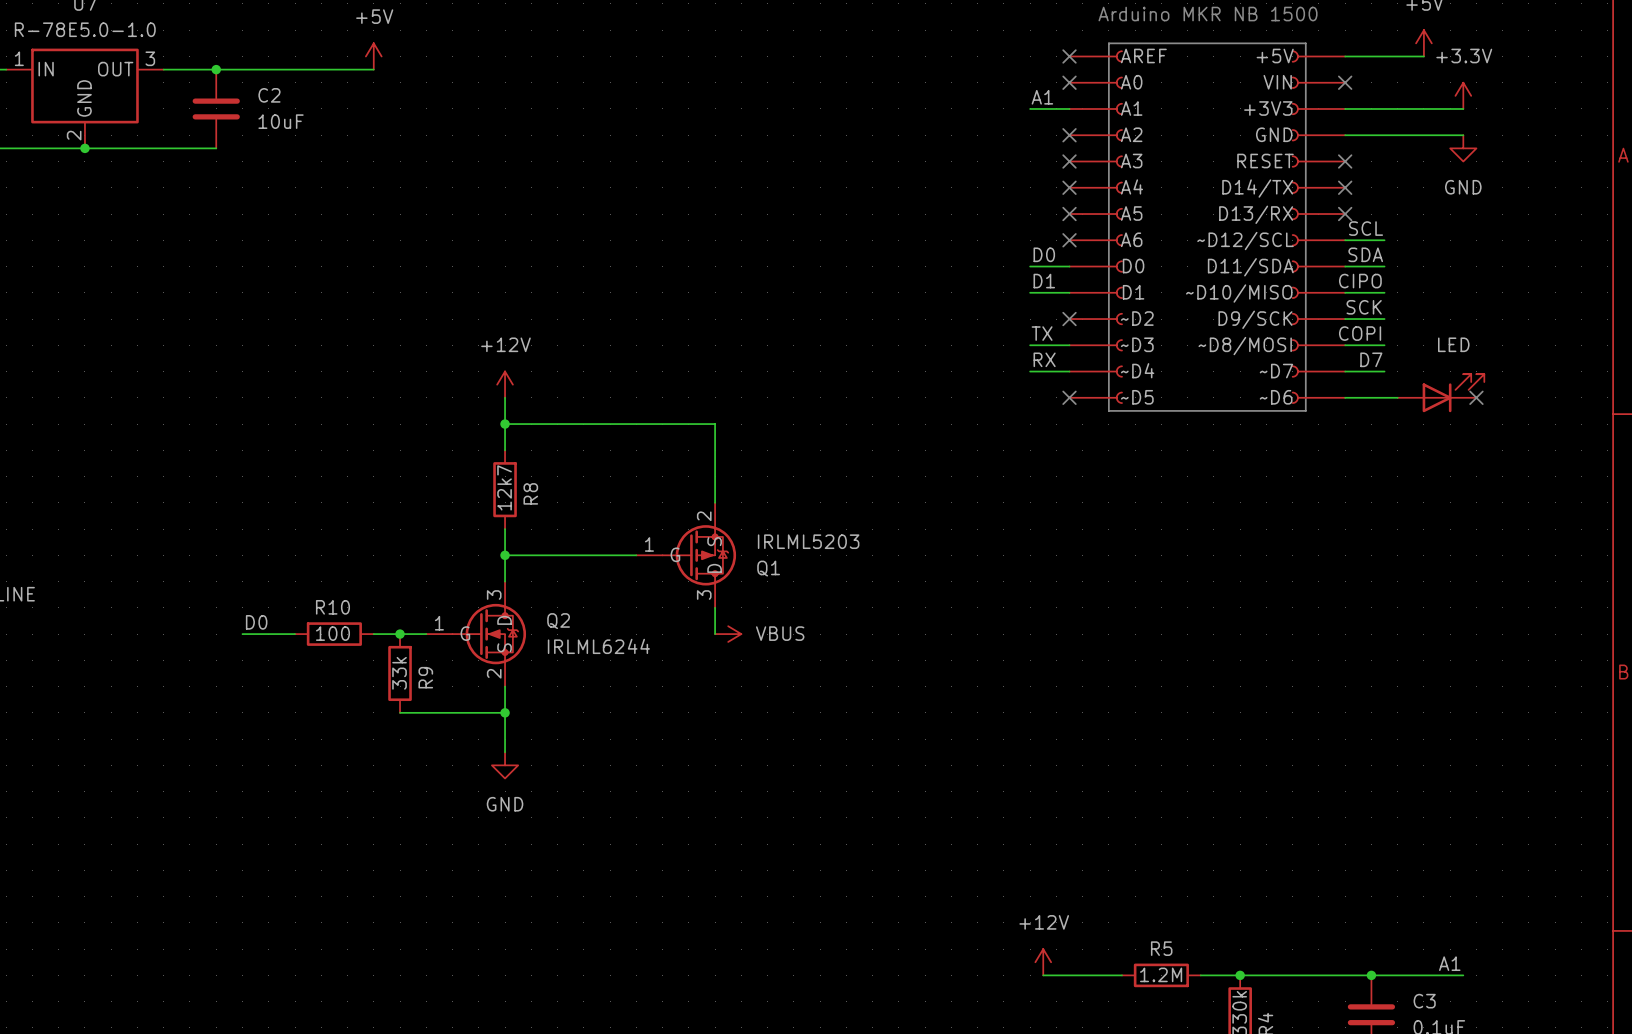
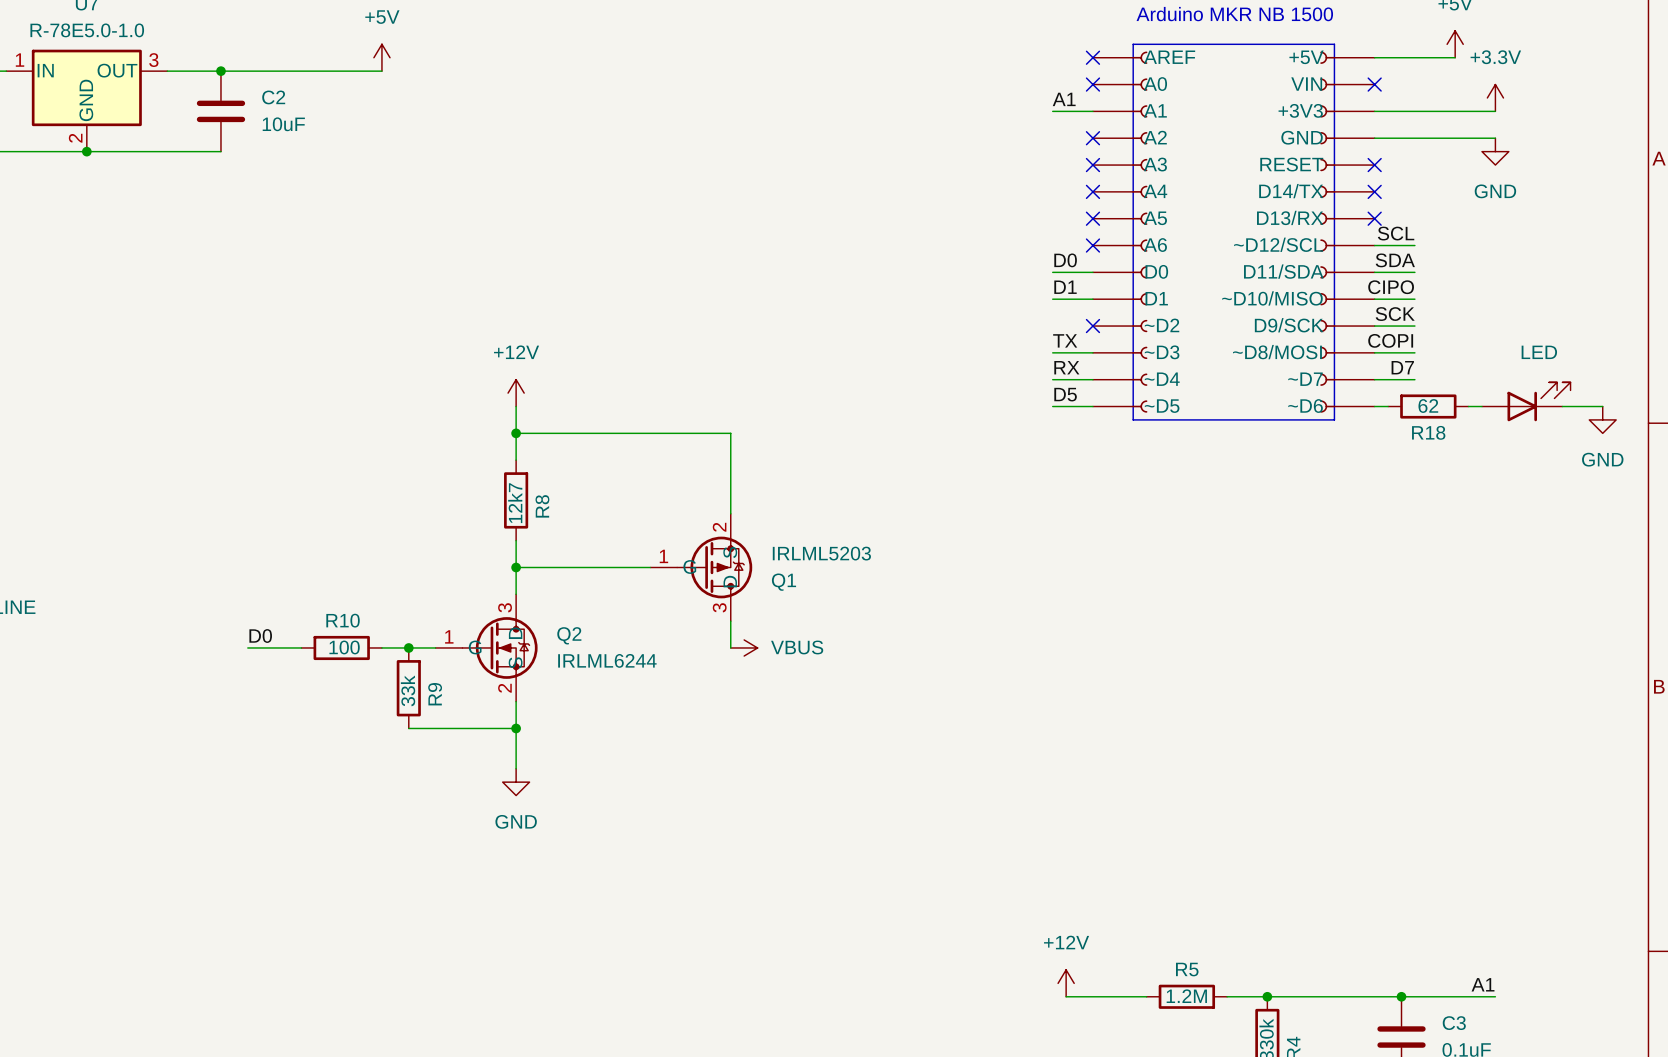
label: none -> D5 (1065, 394)
part position: (1441, 393) -> (1526, 401)
wire: none -> (1052, 406) (1092, 406)
no-connect mark: (1069, 397) -> none
wire: (1358, 397) (1397, 397) -> (1562, 406) (1602, 406)
R18: none -> 62 (1428, 406)
no-connect mark: (1476, 397) -> none
power symbol: none -> GND (1602, 419)

